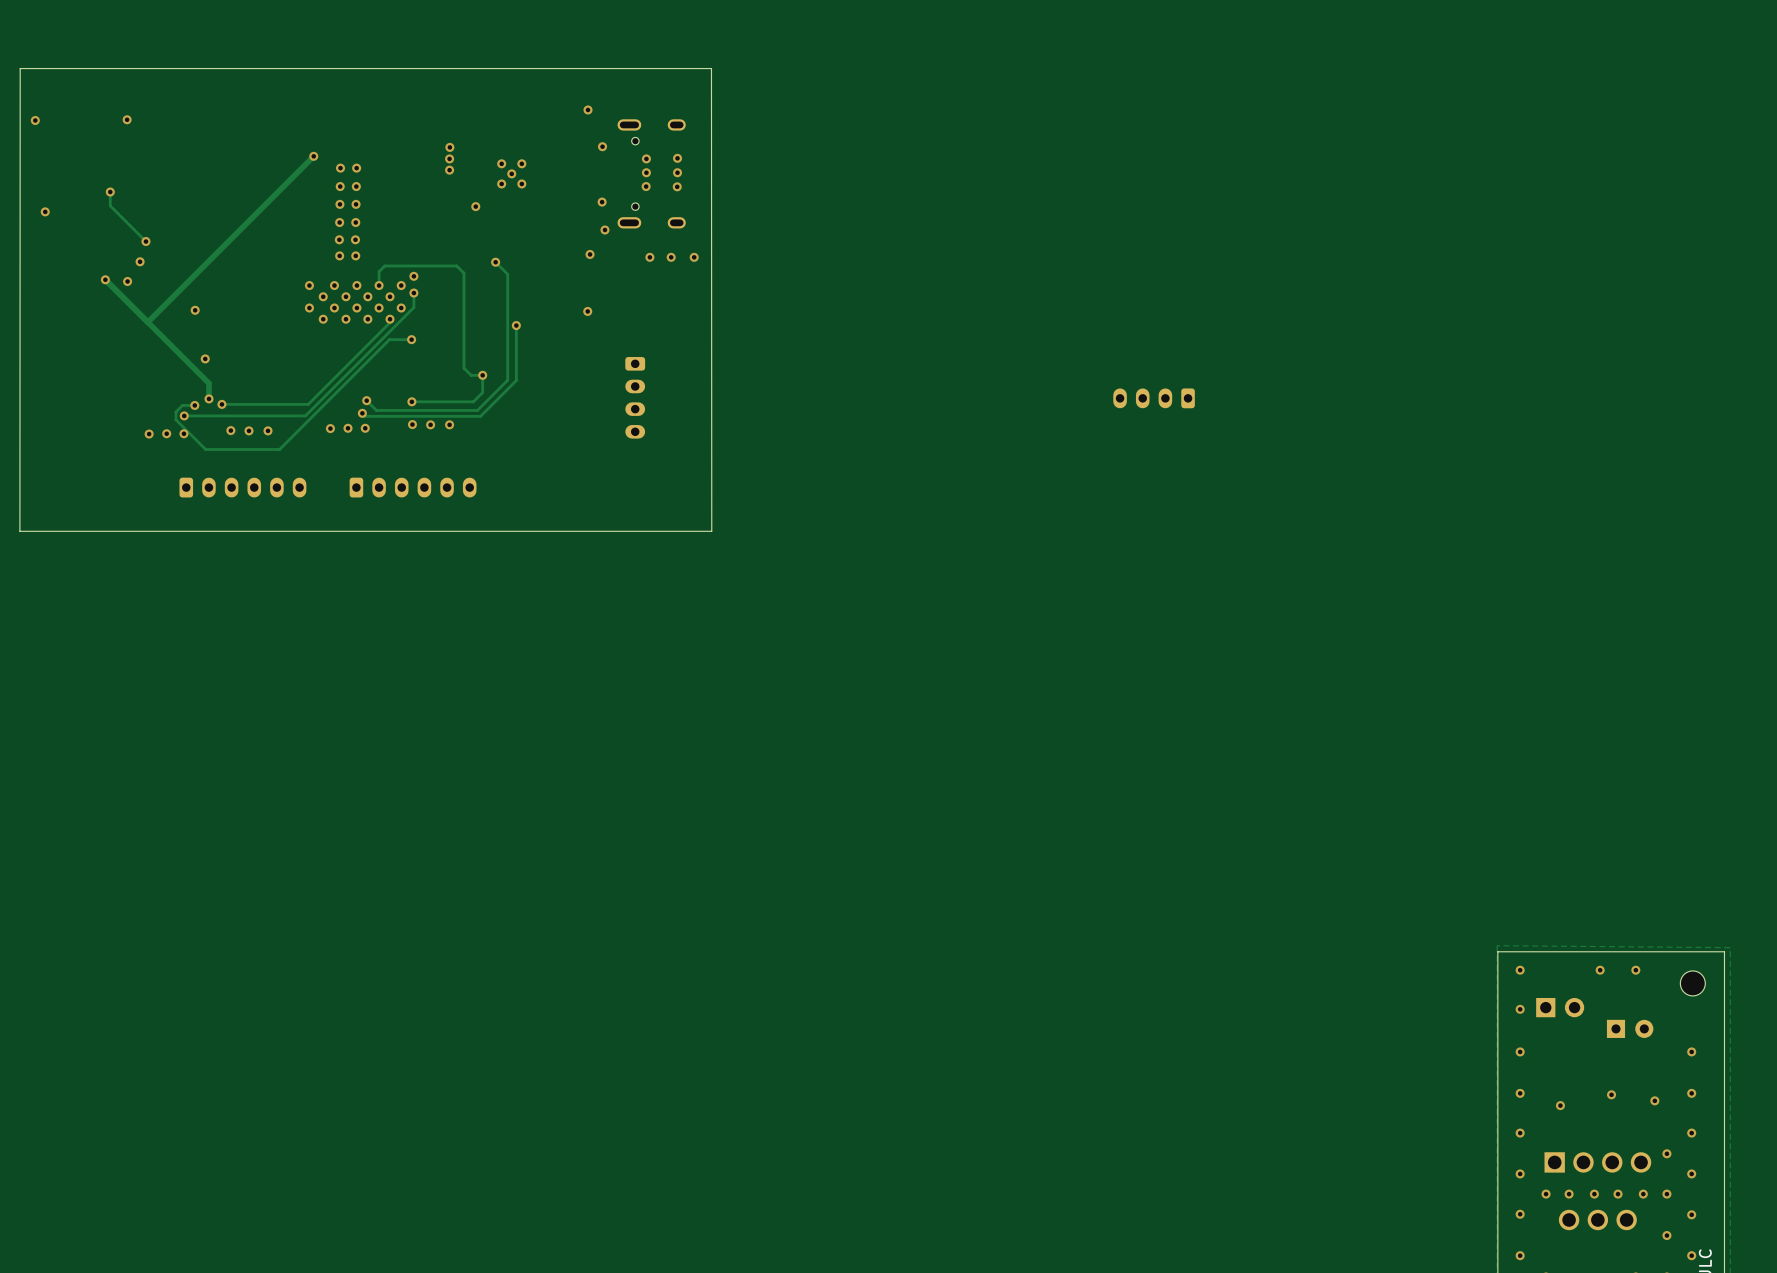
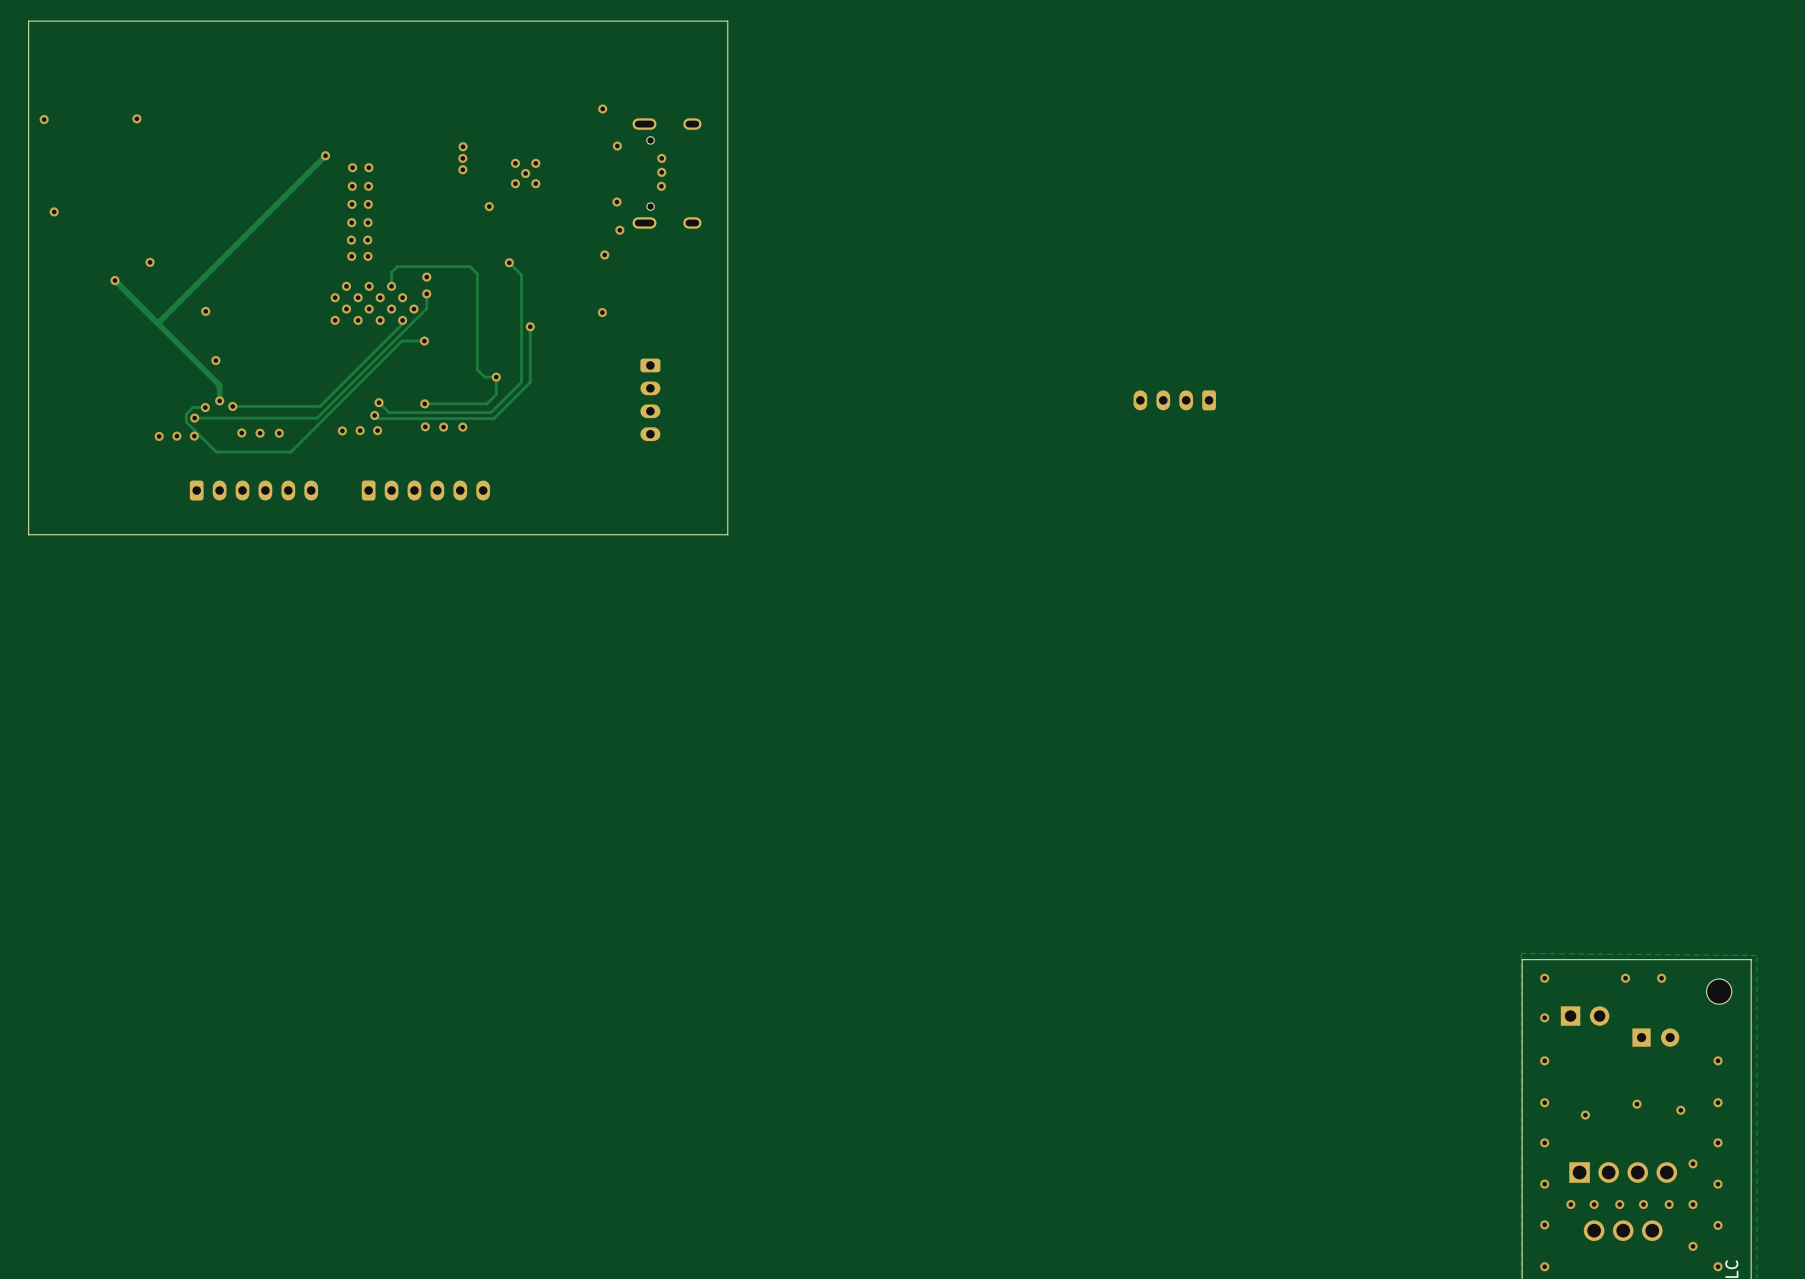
via: (677, 158) -> none
via: (677, 172) -> none
via: (677, 186) -> none
track: (110, 192) (110, 205) (145, 241) -> none
via: (110, 192) -> none
via: (145, 241) -> none
via: (649, 257) -> none
via: (671, 257) -> none
via: (694, 257) -> none
via: (127, 281) -> none
via: (309, 285) -> none
via: (401, 285) -> none
via: (309, 307) -> none
board edge: (711, 531) (711, 68) (20, 68) (19, 531) -> (727, 534) (727, 21) (28, 21) (28, 534)

